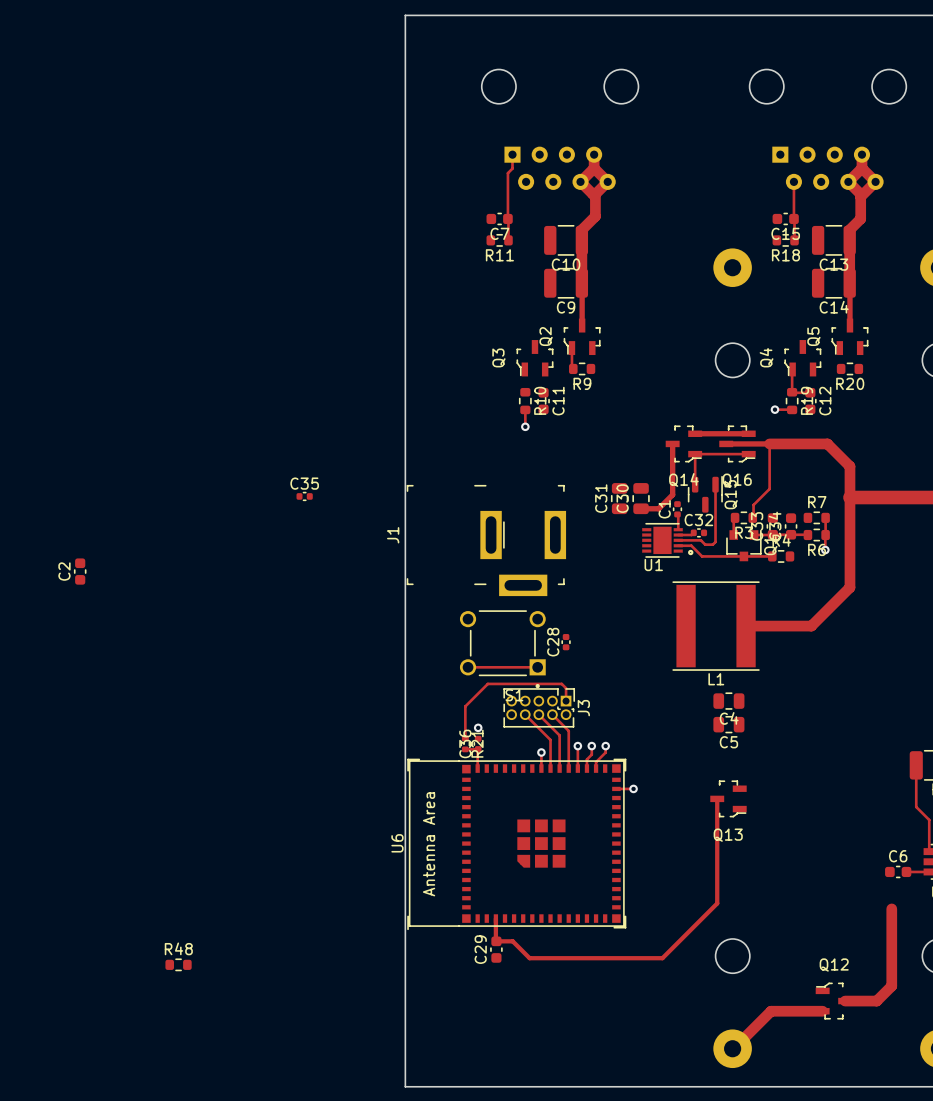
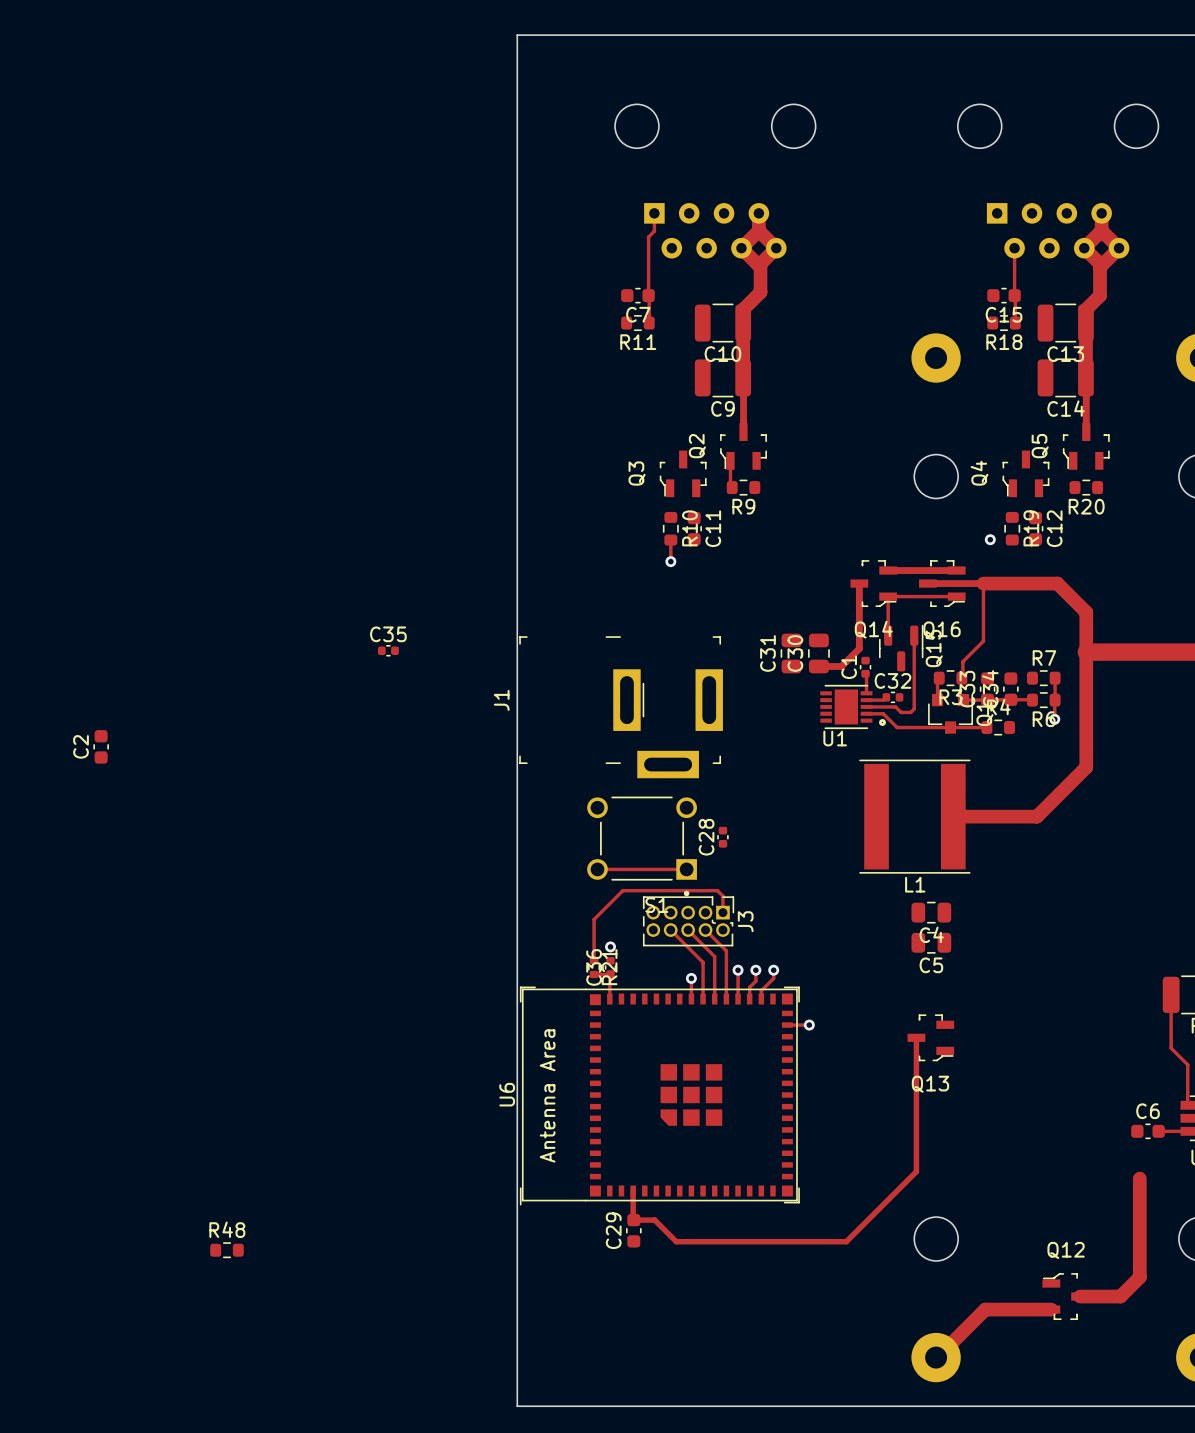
top track: (792, 369) (792, 392) (810, 392) -> none
top track: (774, 409) (792, 409) -> none

